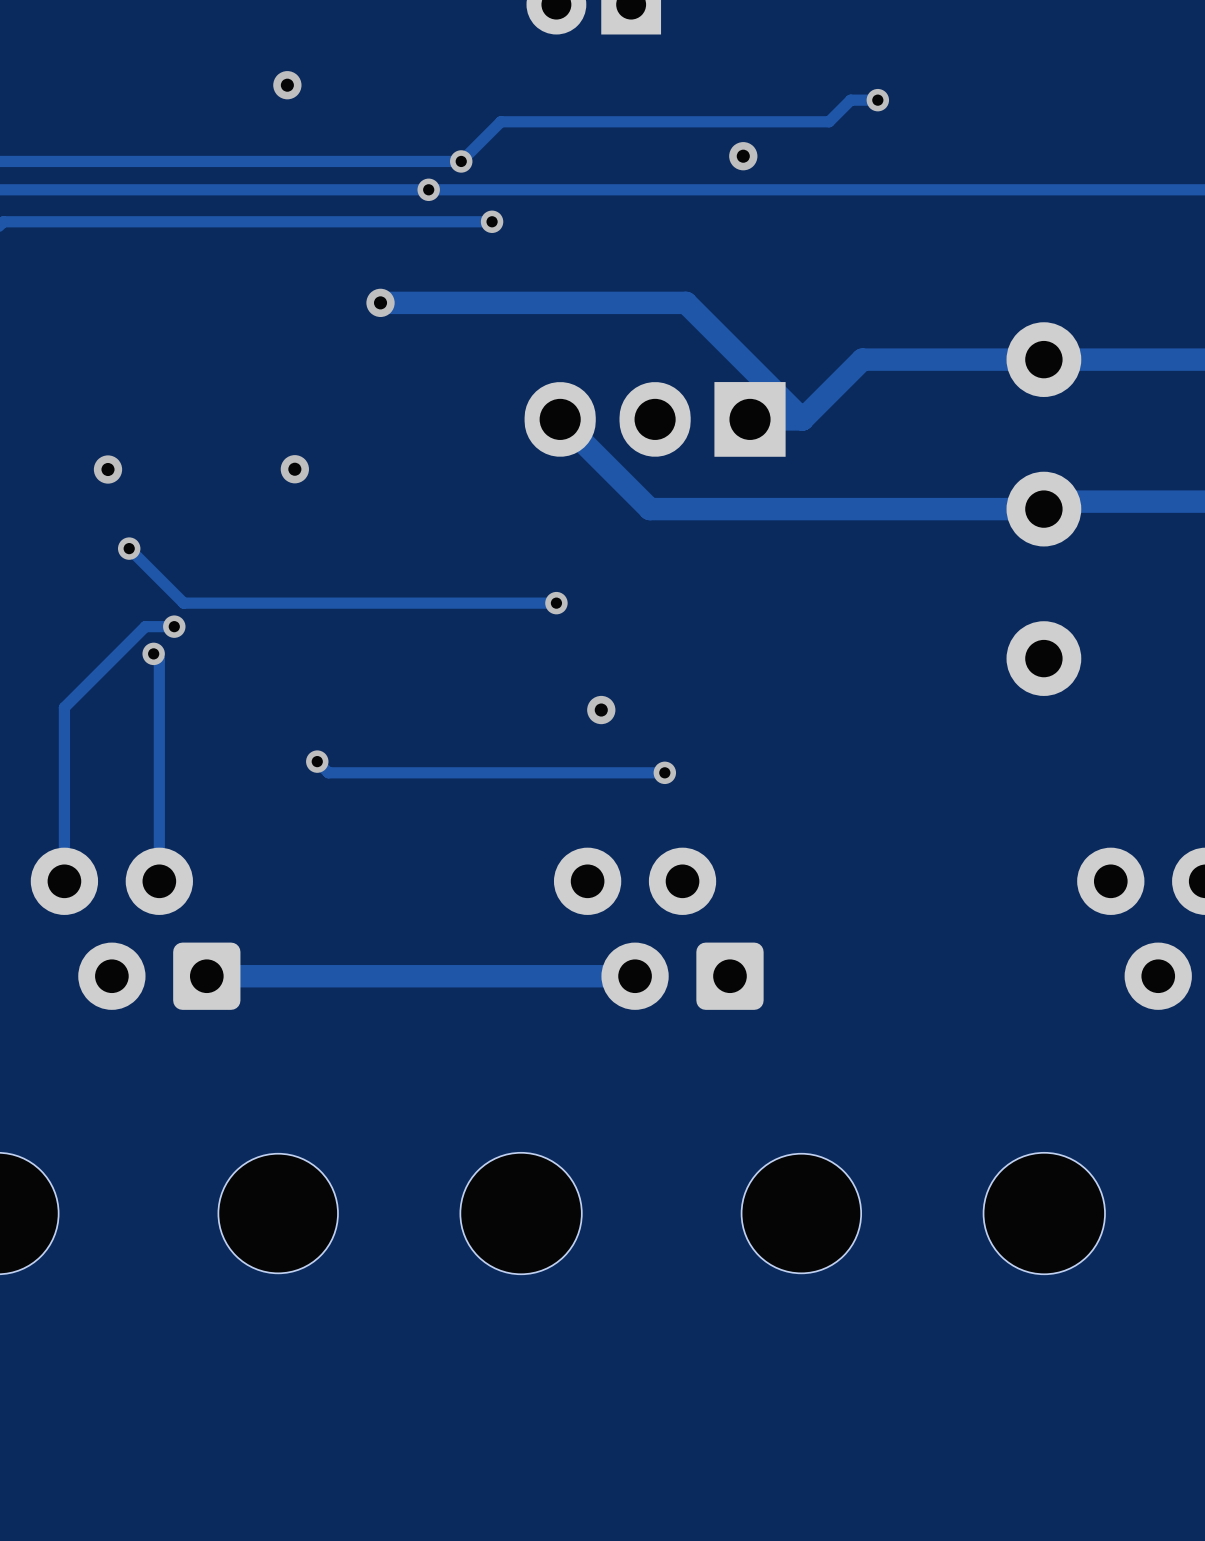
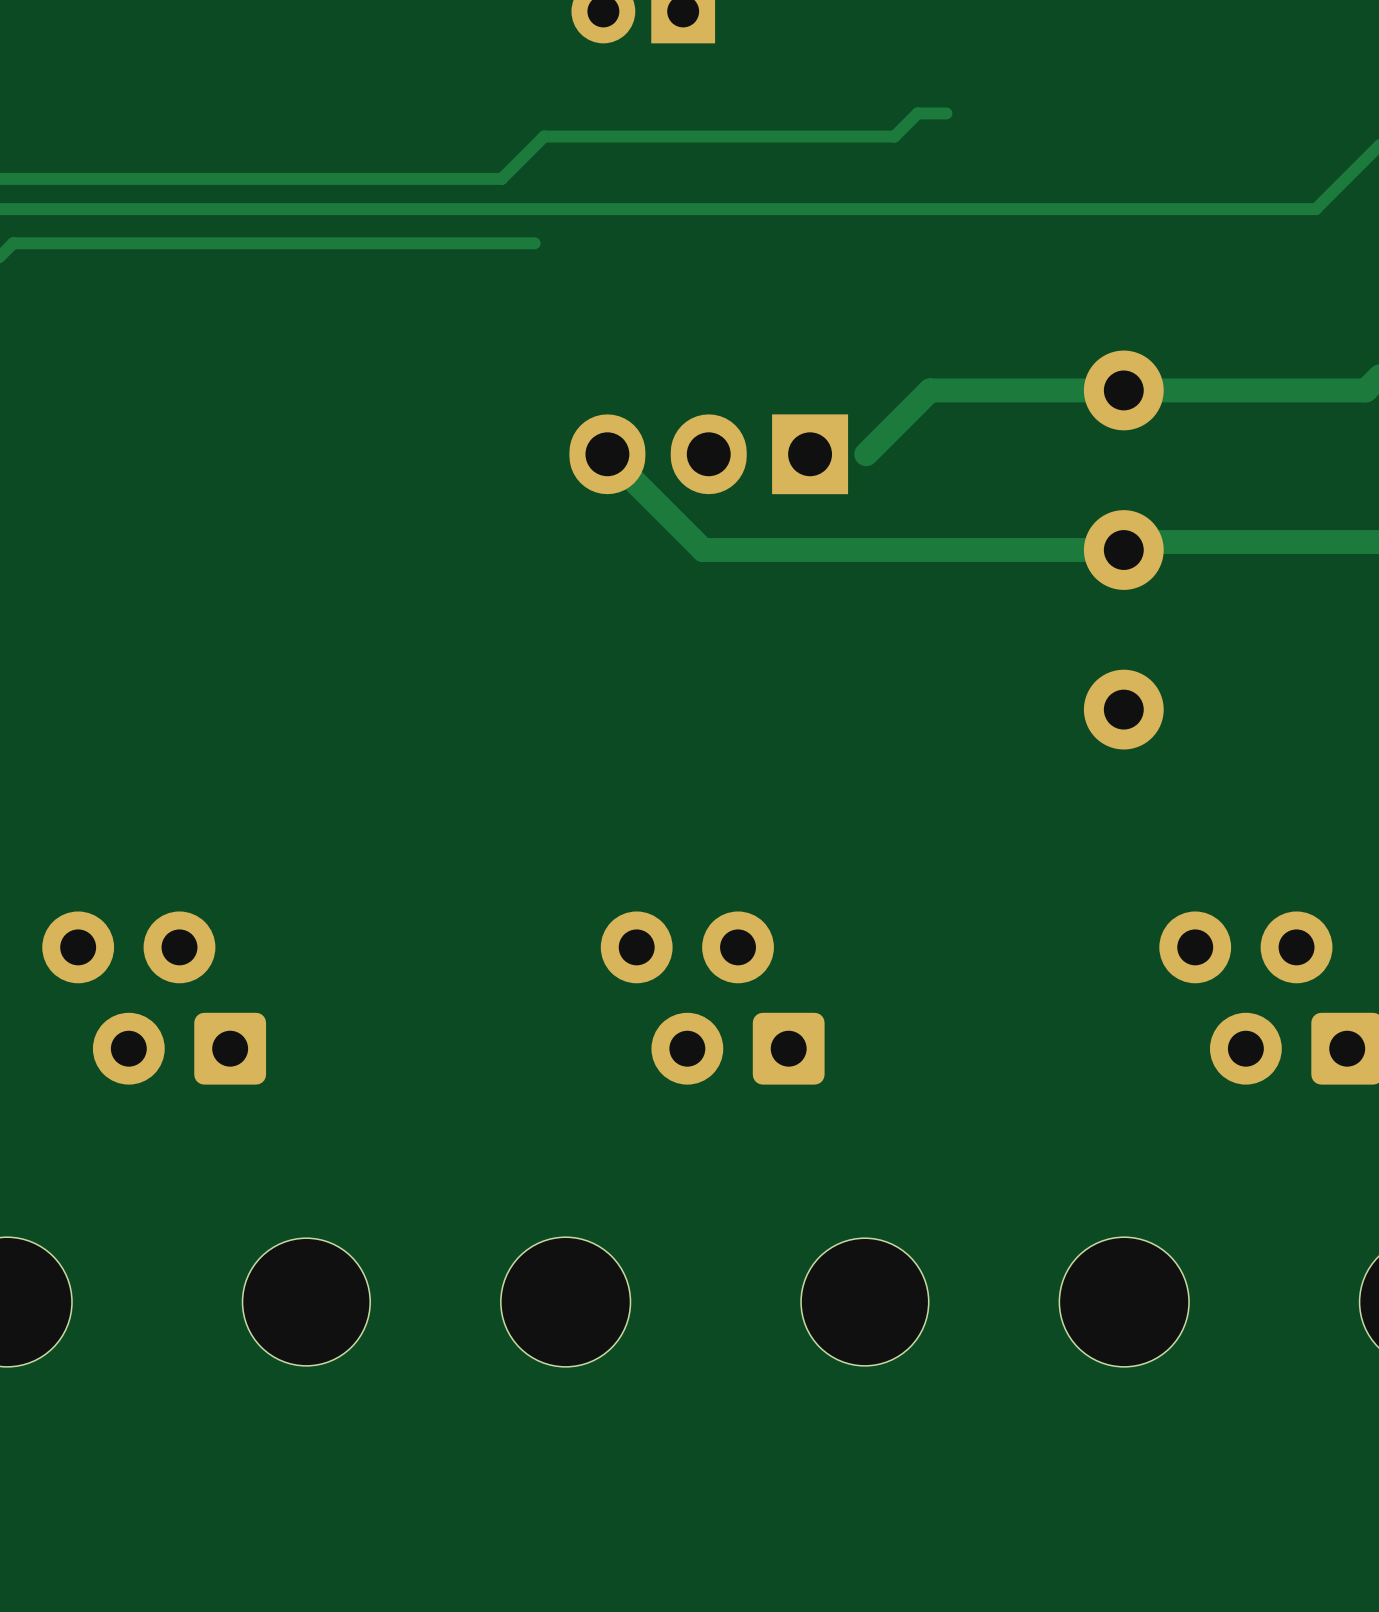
via: (287, 85) -> none
via: (877, 100) -> none
via: (743, 156) -> none
via: (461, 161) -> none
via: (428, 189) -> none
via: (492, 221) -> none
track: (380, 302) (686, 302) (802, 419) (750, 419) -> none
via: (380, 302) -> none
via: (107, 469) -> none
via: (294, 469) -> none
track: (129, 548) (183, 603) (556, 603) -> none
via: (129, 548) -> none
via: (556, 603) -> none
track: (174, 626) (145, 626) (64, 707) (64, 881) -> none
via: (174, 626) -> none
track: (153, 653) (159, 659) (159, 881) -> none
via: (153, 653) -> none
via: (601, 710) -> none
track: (317, 761) (328, 772) (664, 772) -> none
via: (317, 761) -> none
via: (664, 772) -> none
track: (635, 976) (206, 976) -> none

